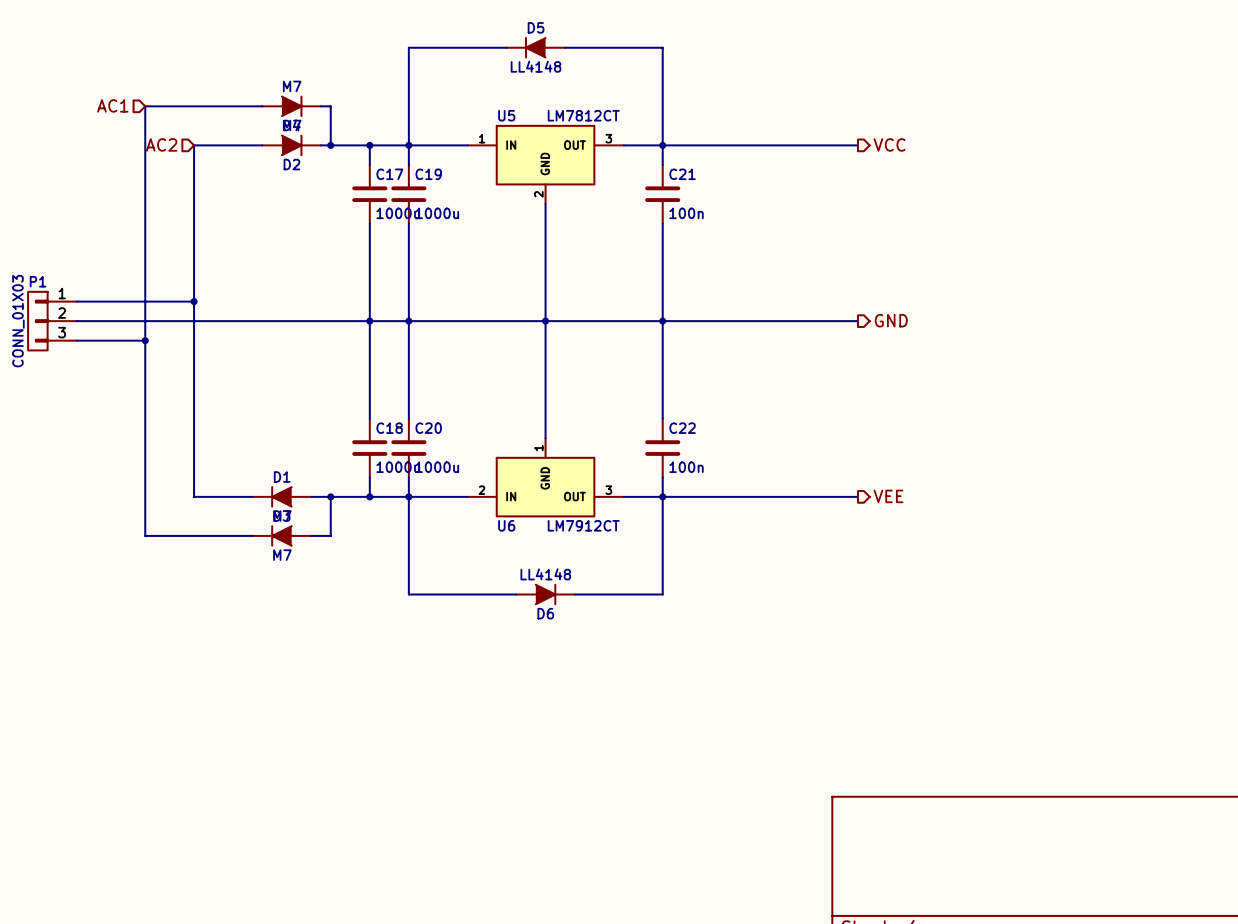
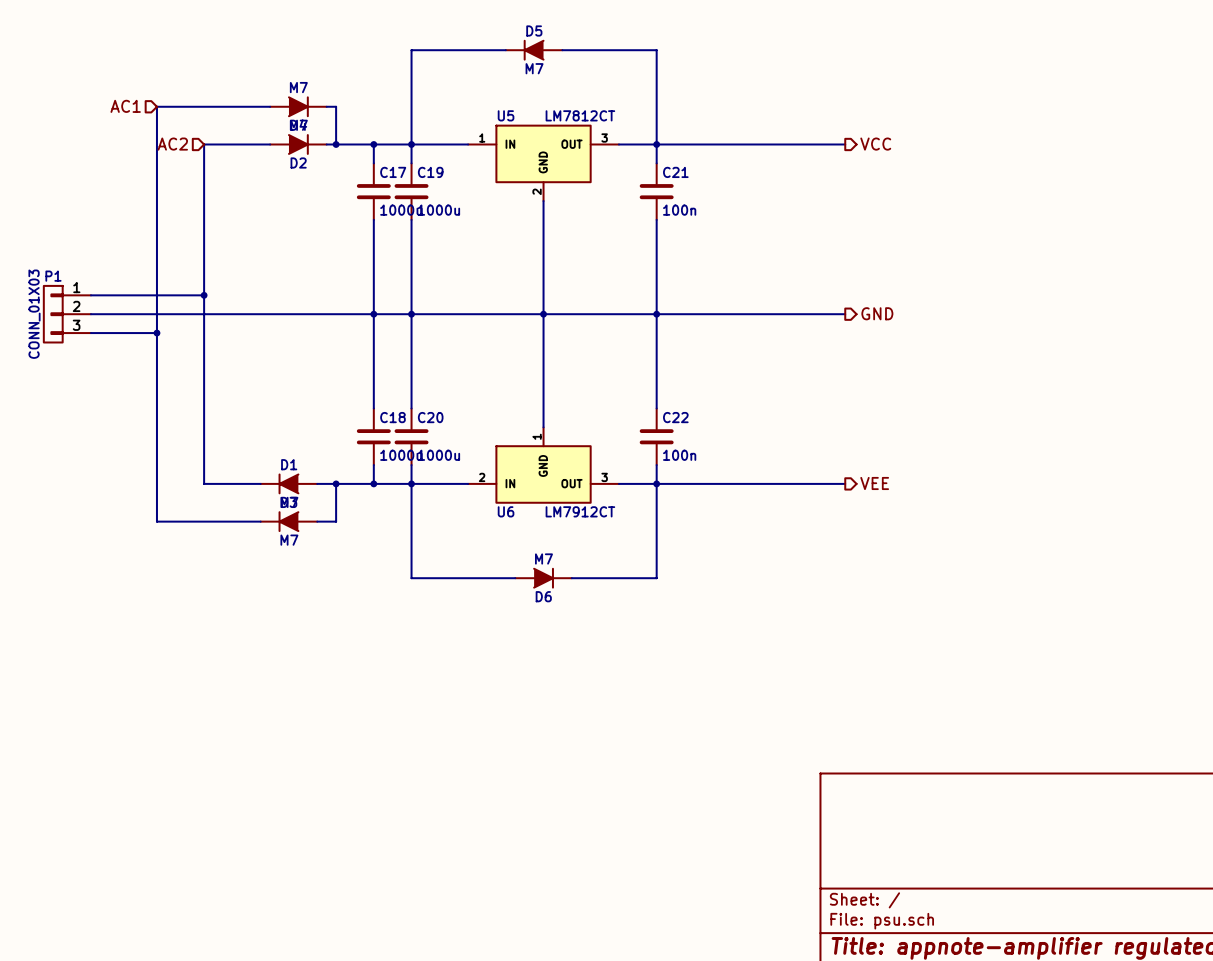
D5 value: LL4148 (536, 66) -> M7 (534, 68)
D6 value: LL4148 (545, 574) -> M7 (543, 558)

